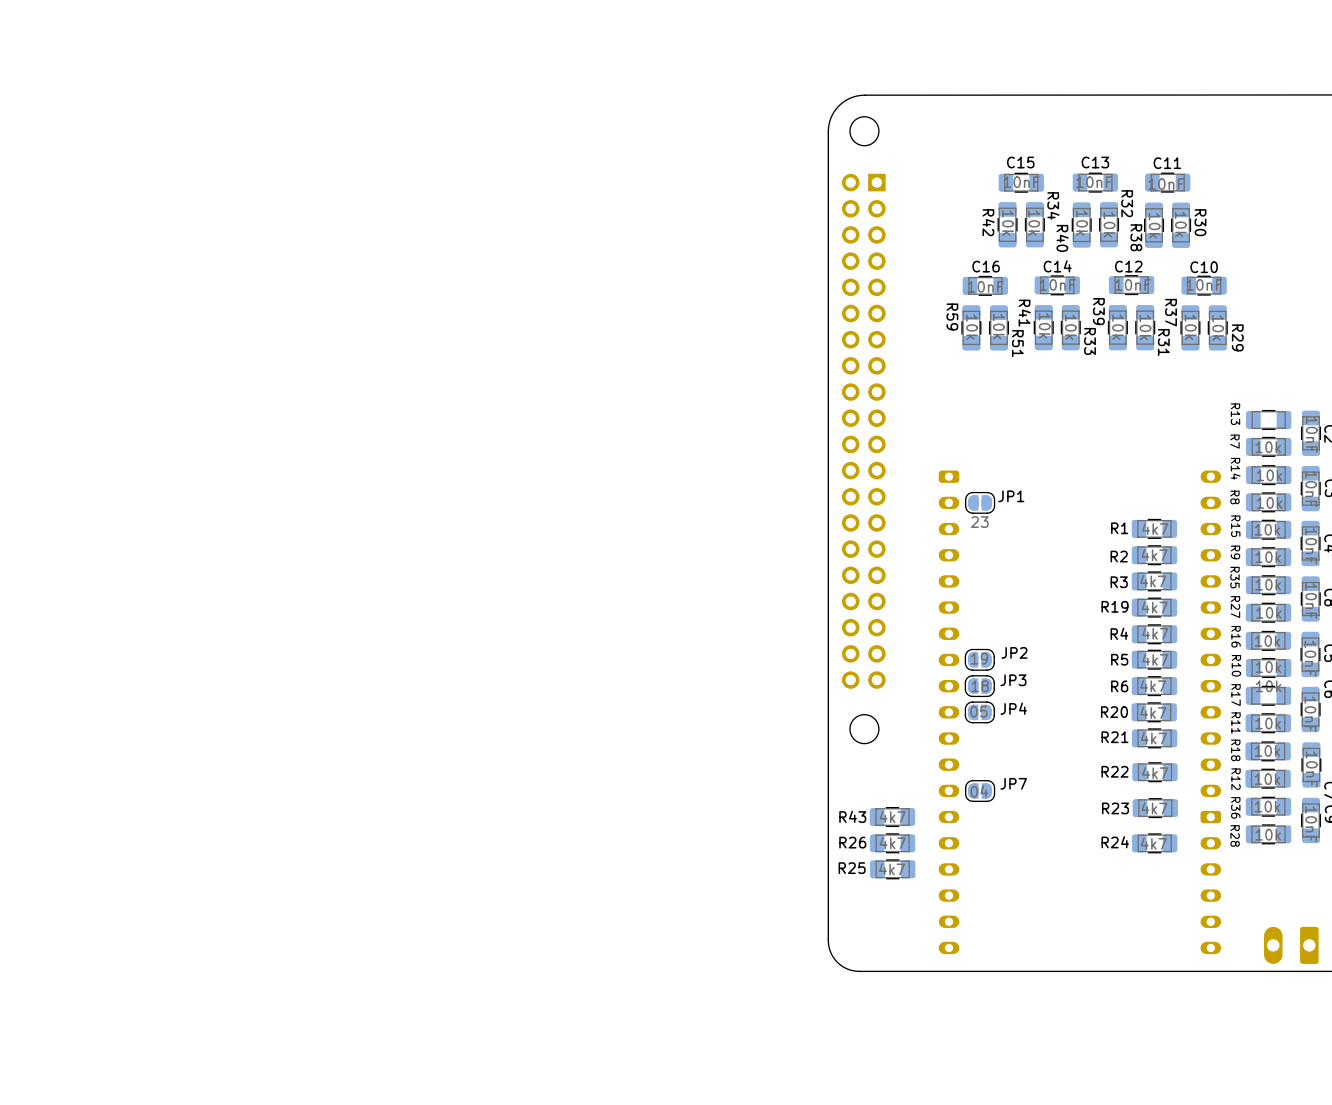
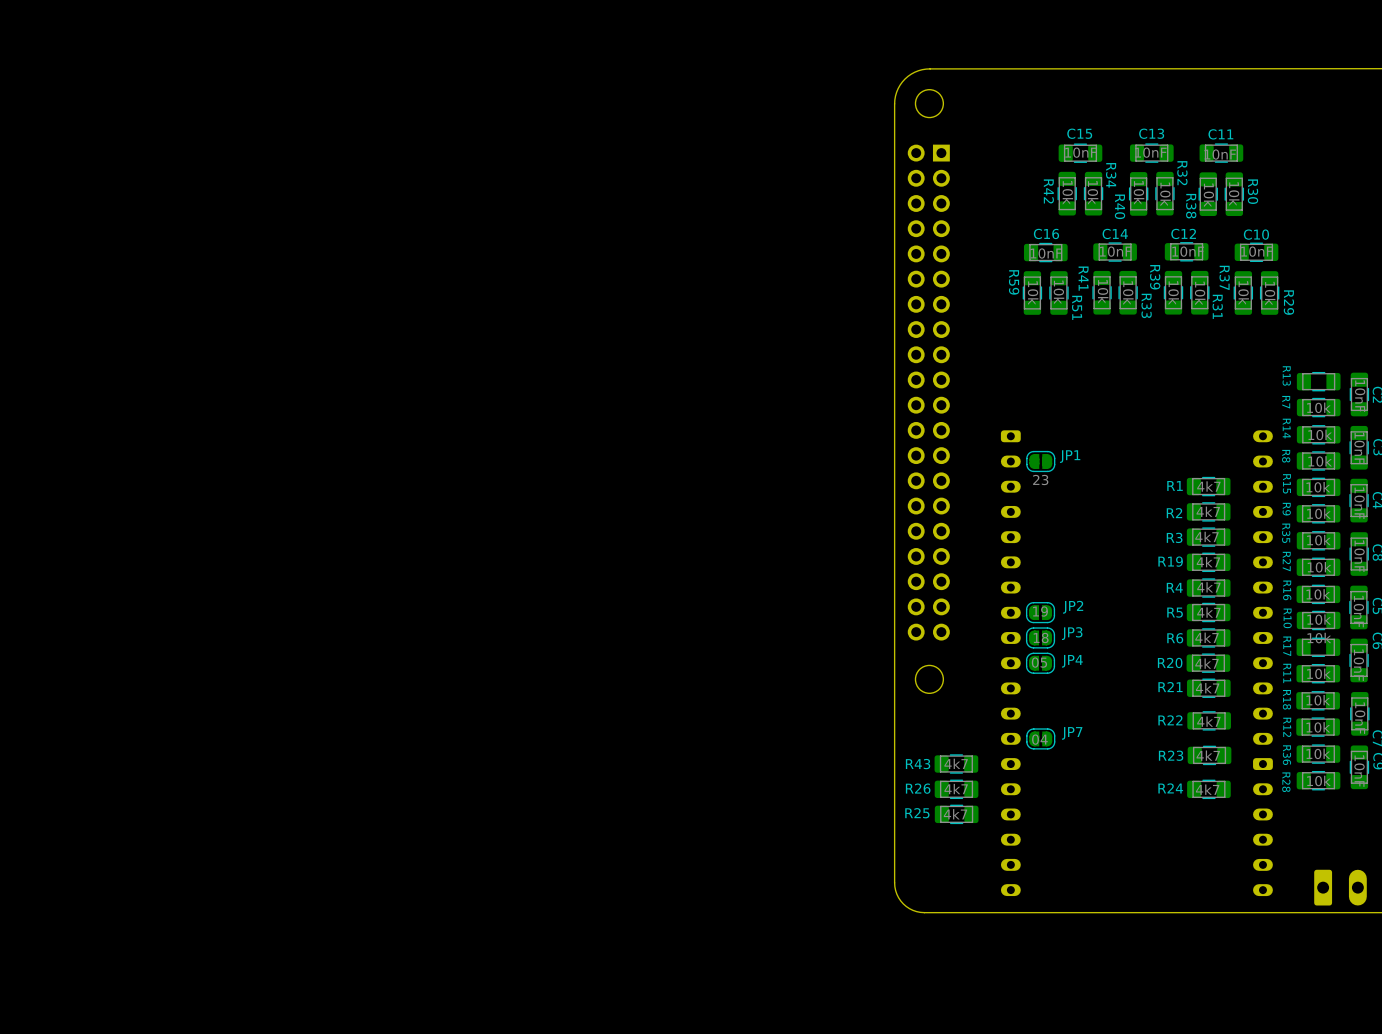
part rotation: 0° (1291, 945) -> 180° (1340, 887)

